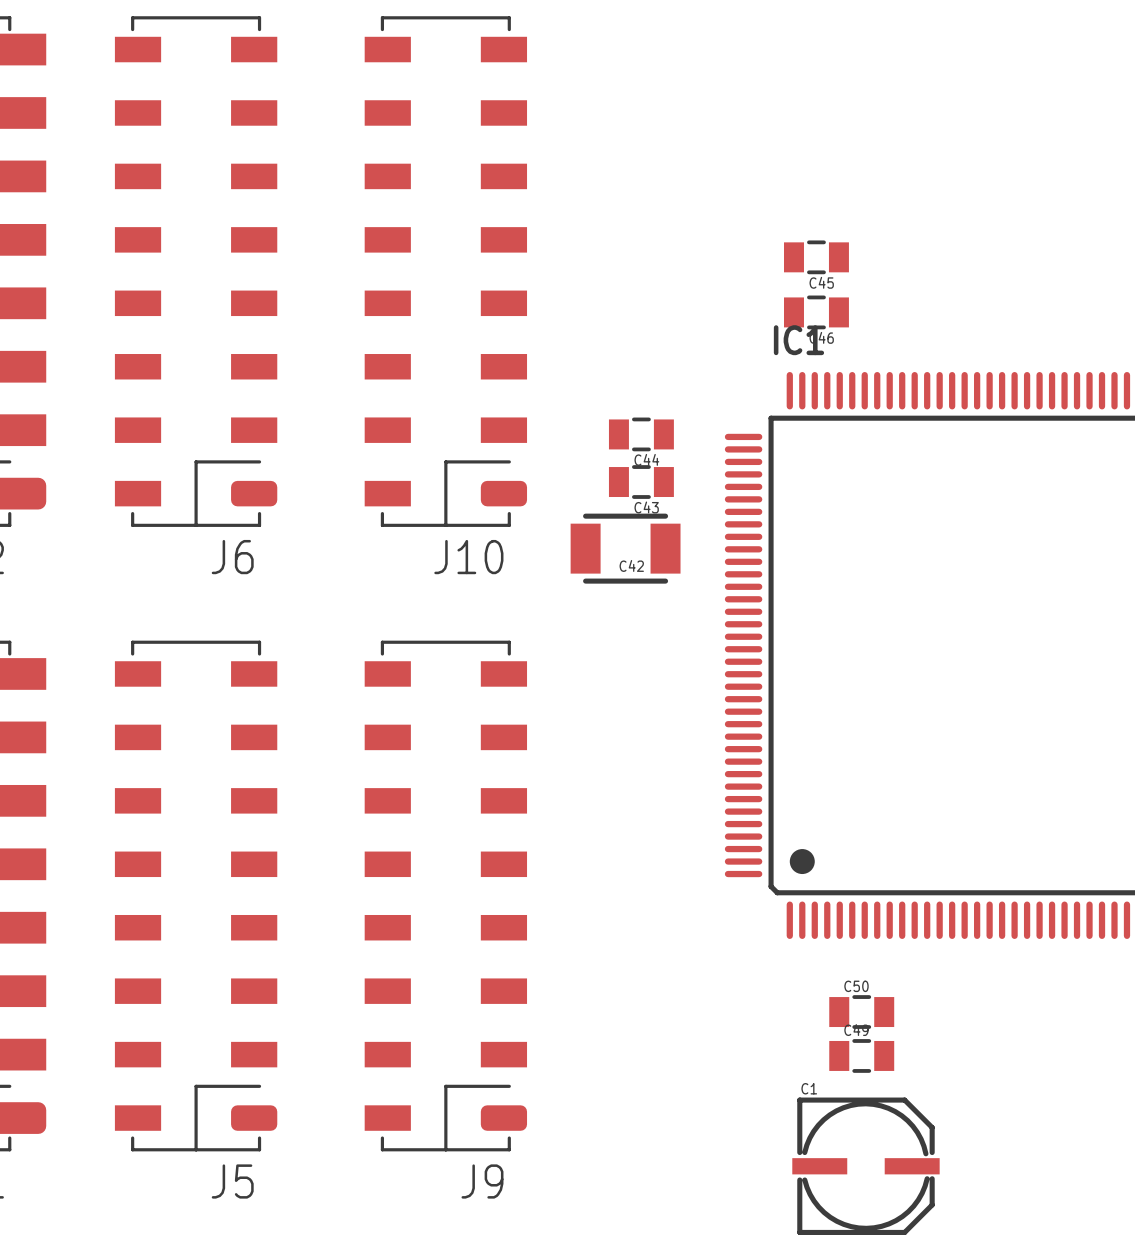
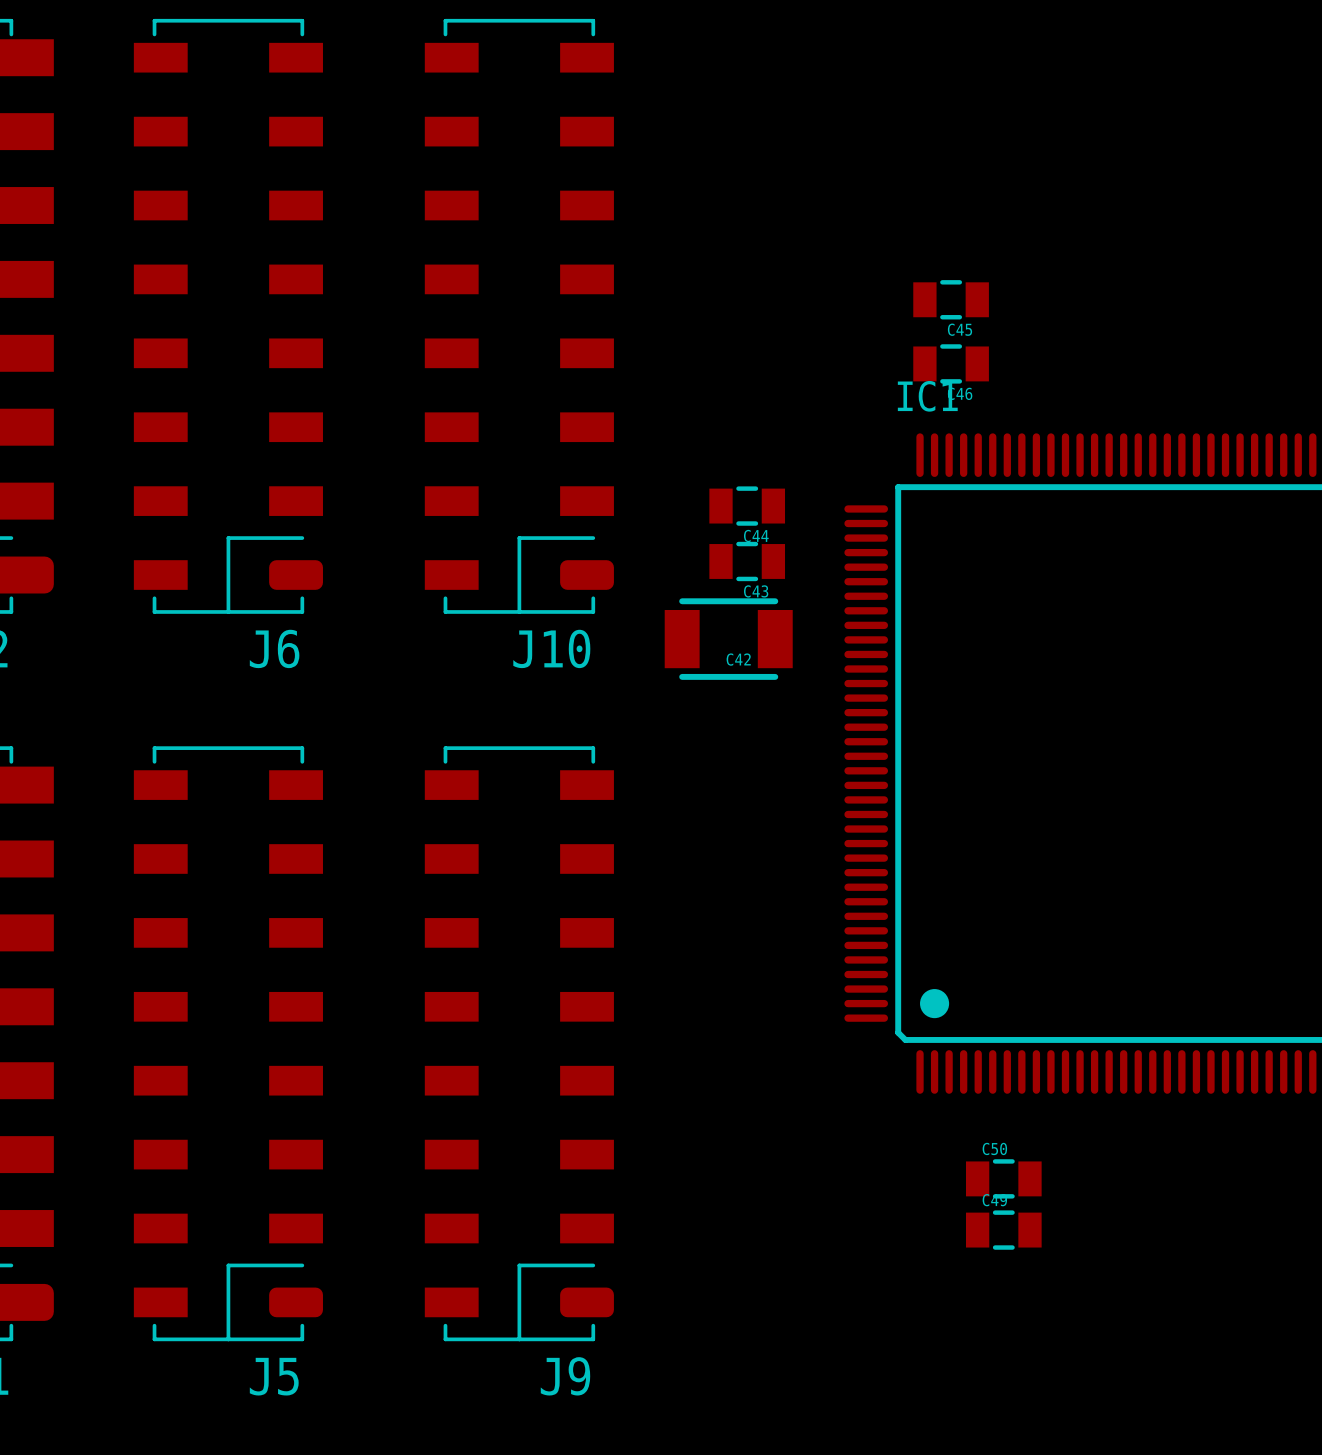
C1: (865, 1166) -> none

